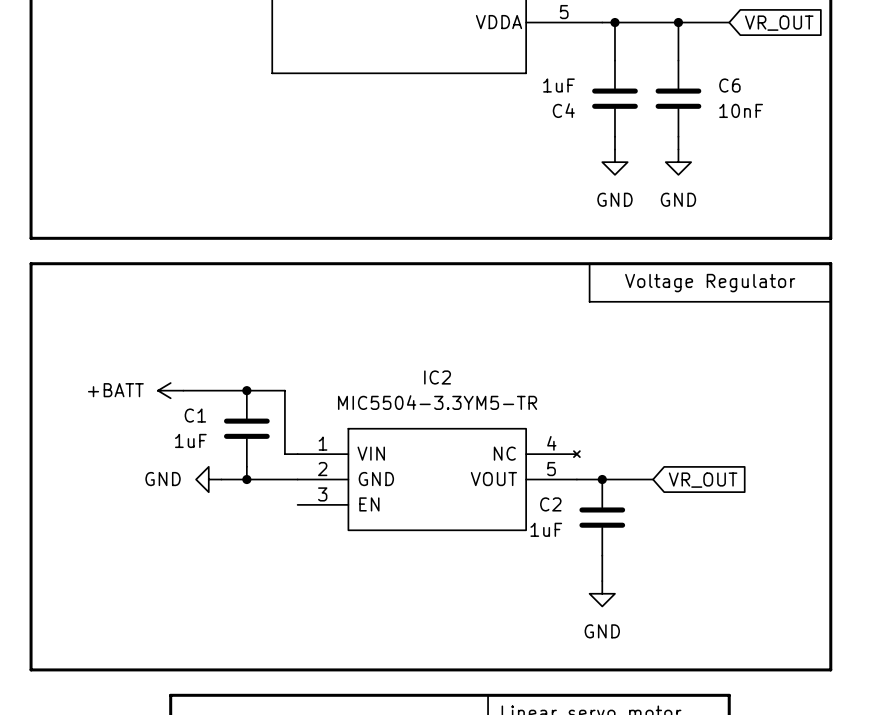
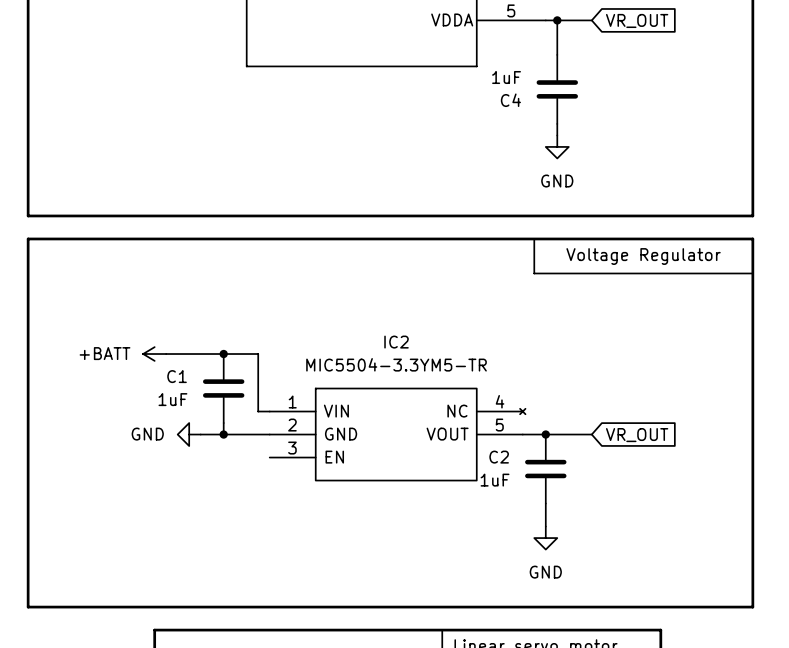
wire: (653, 22) (729, 22) -> none
wire: (678, 22) (678, 60) -> none
junction: (678, 22) -> none
global label position: VR_OUT (779, 23) -> VR_OUT (637, 20)
C6: 10nF (678, 98) -> none
wire: (678, 136) (678, 149) -> none
power symbol: GND (678, 162) -> none

